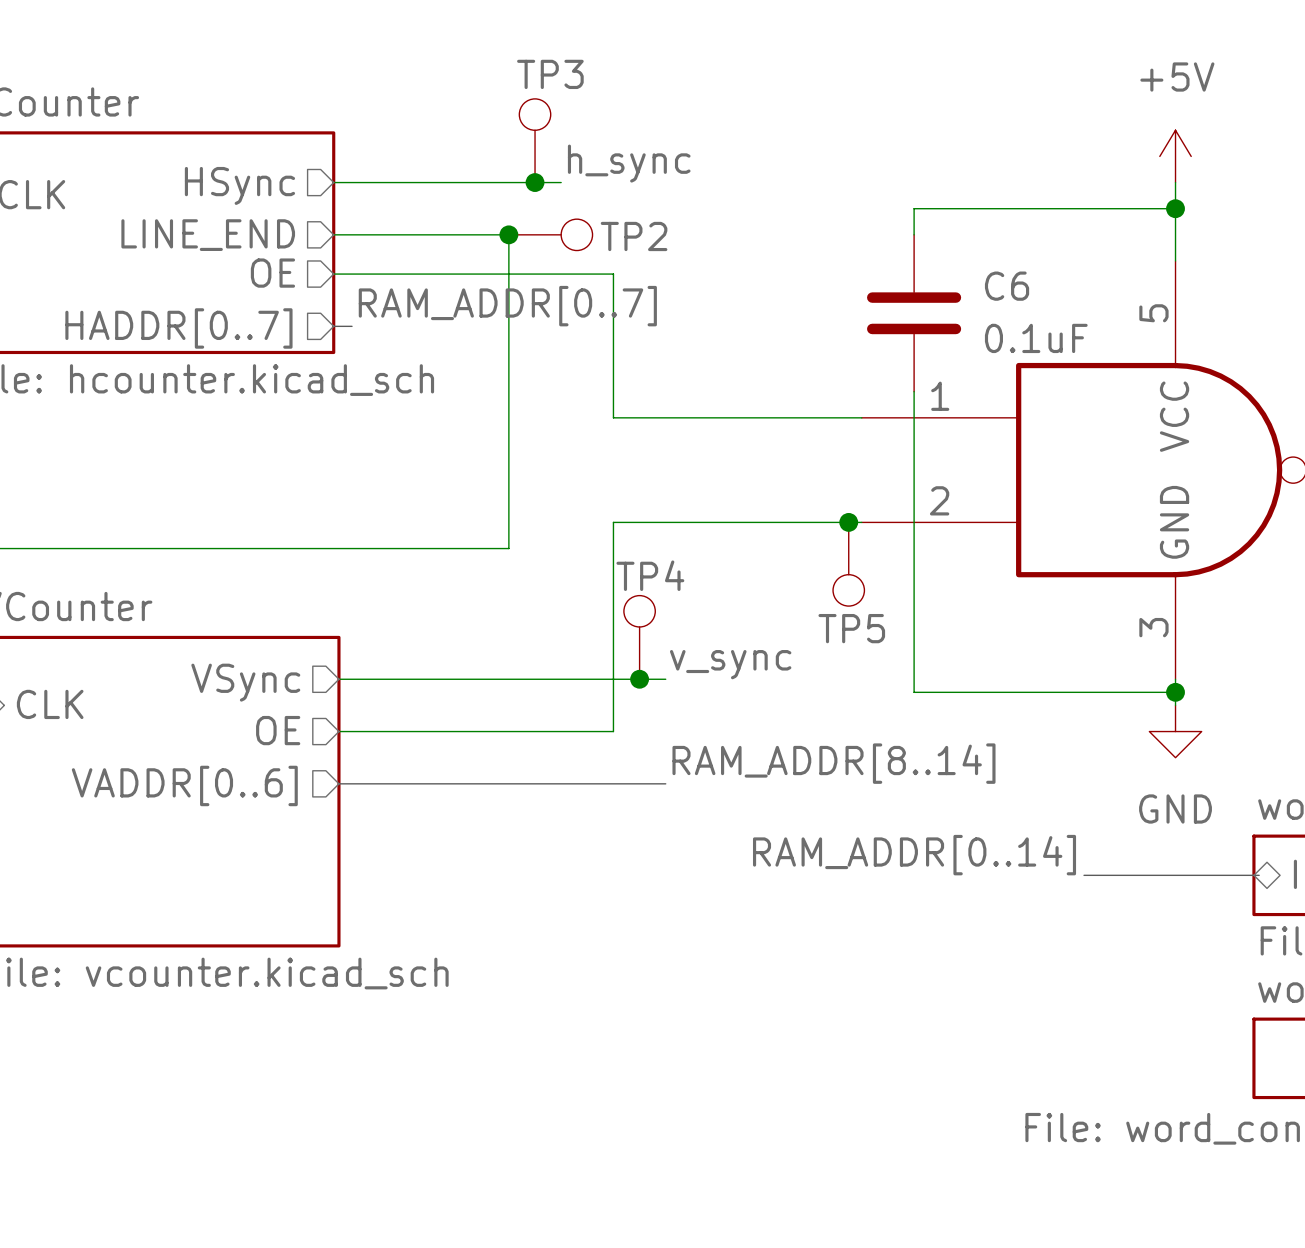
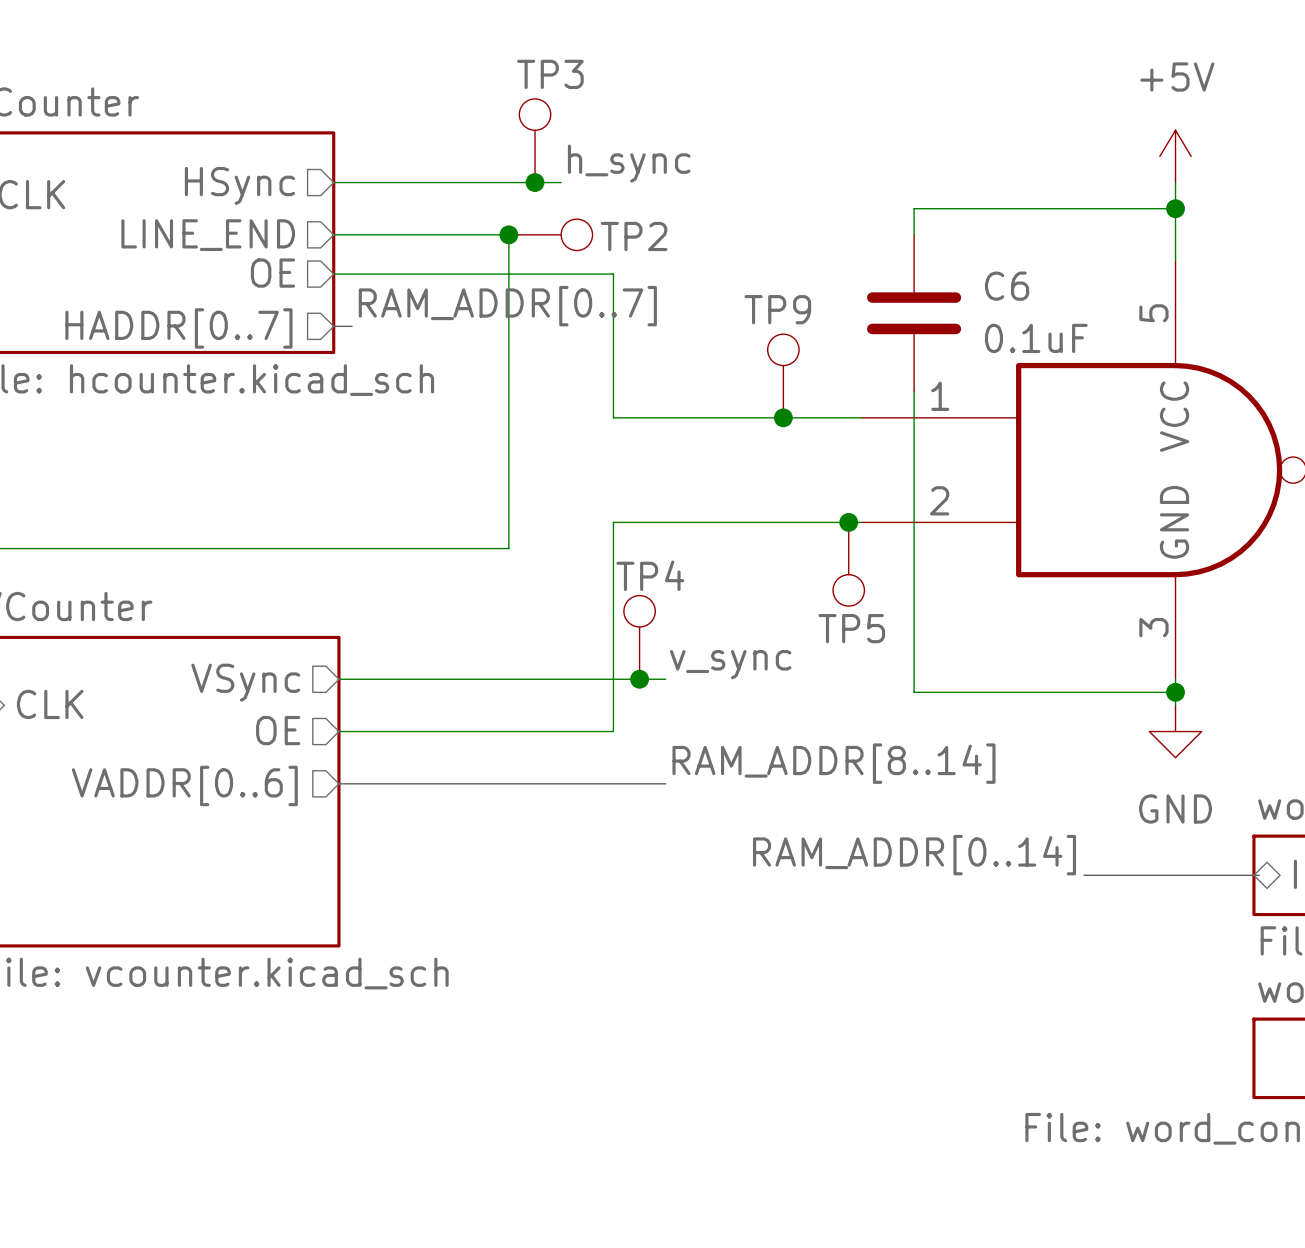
TP9: none -> (783, 376)
junction: none -> (783, 417)

